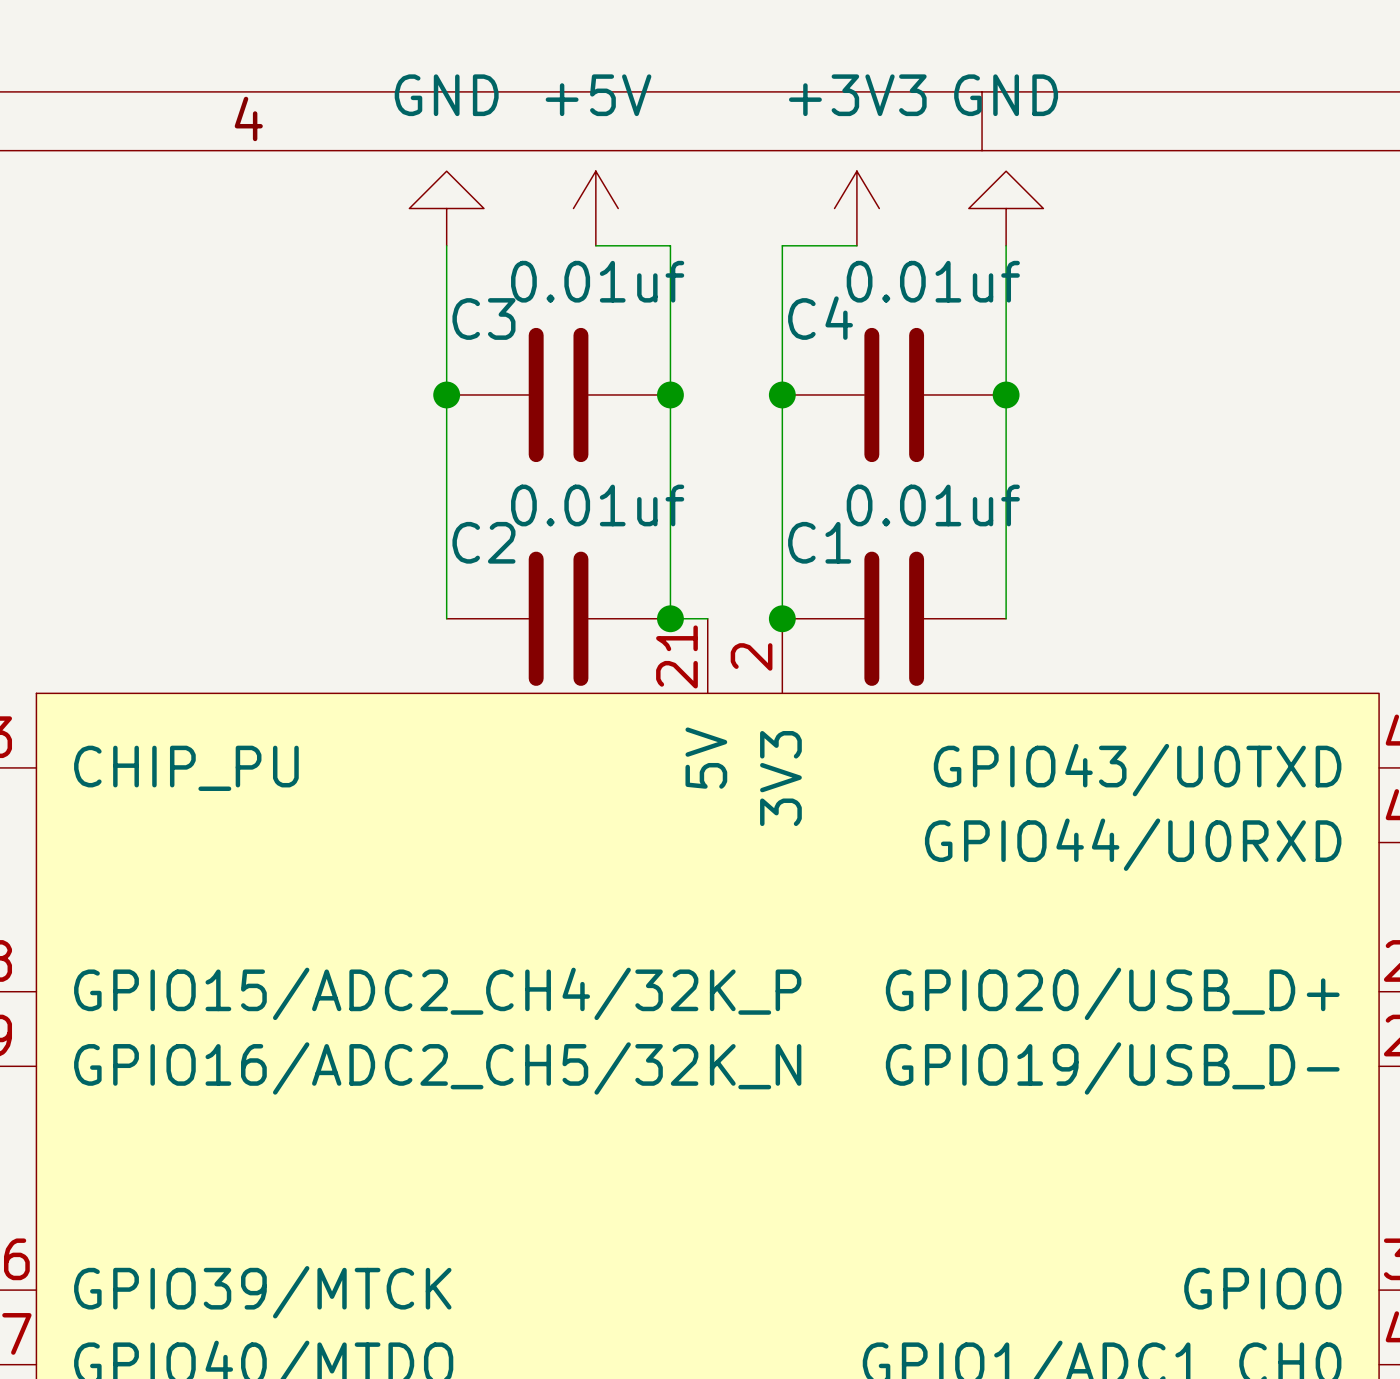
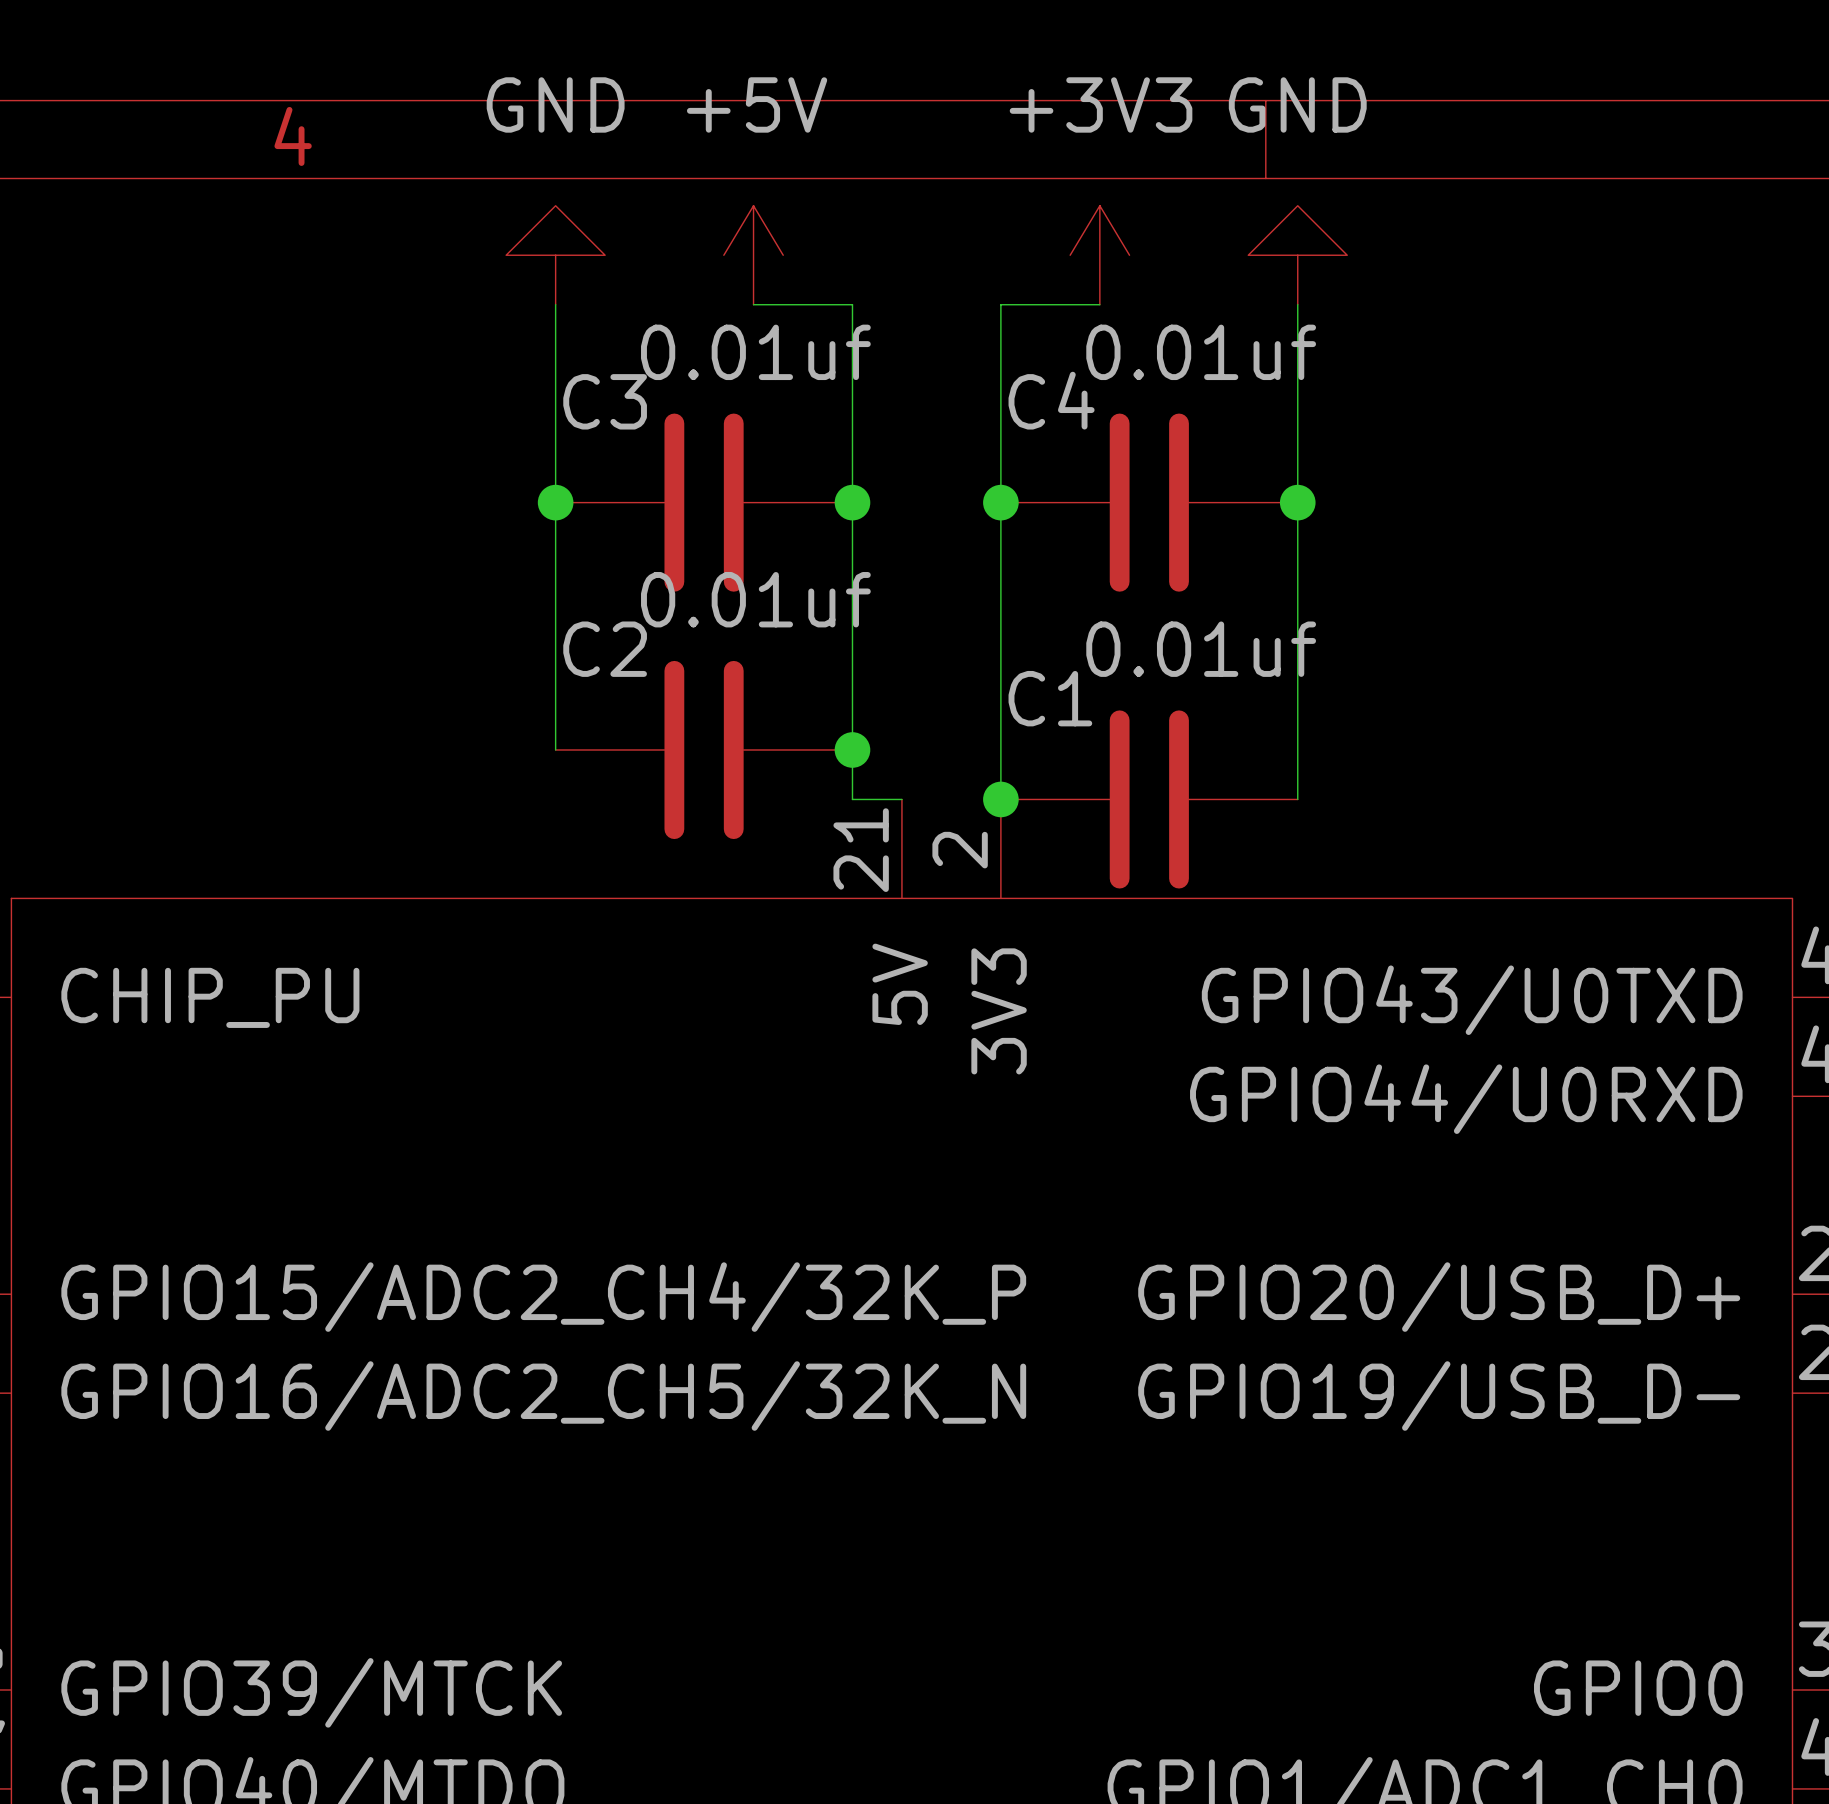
wire: (446, 581) (446, 618) -> none
C2 position: (558, 618) -> (704, 749)
junction position: (670, 618) -> (852, 749)

